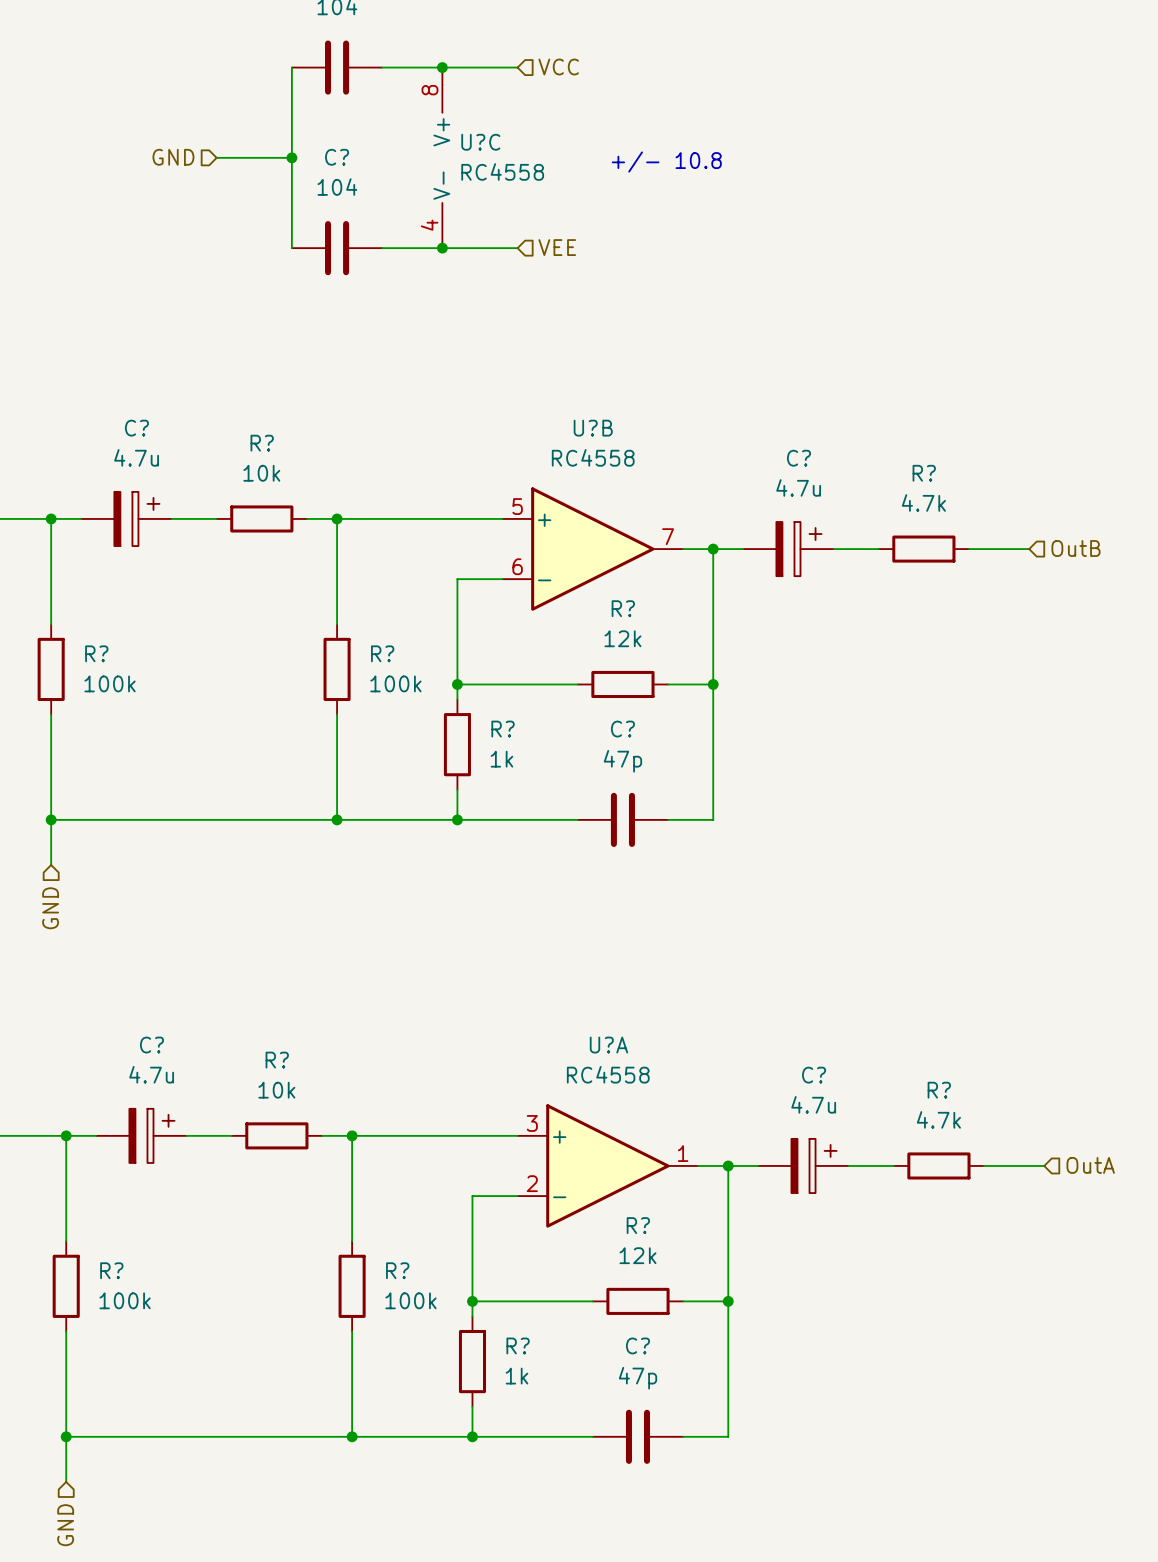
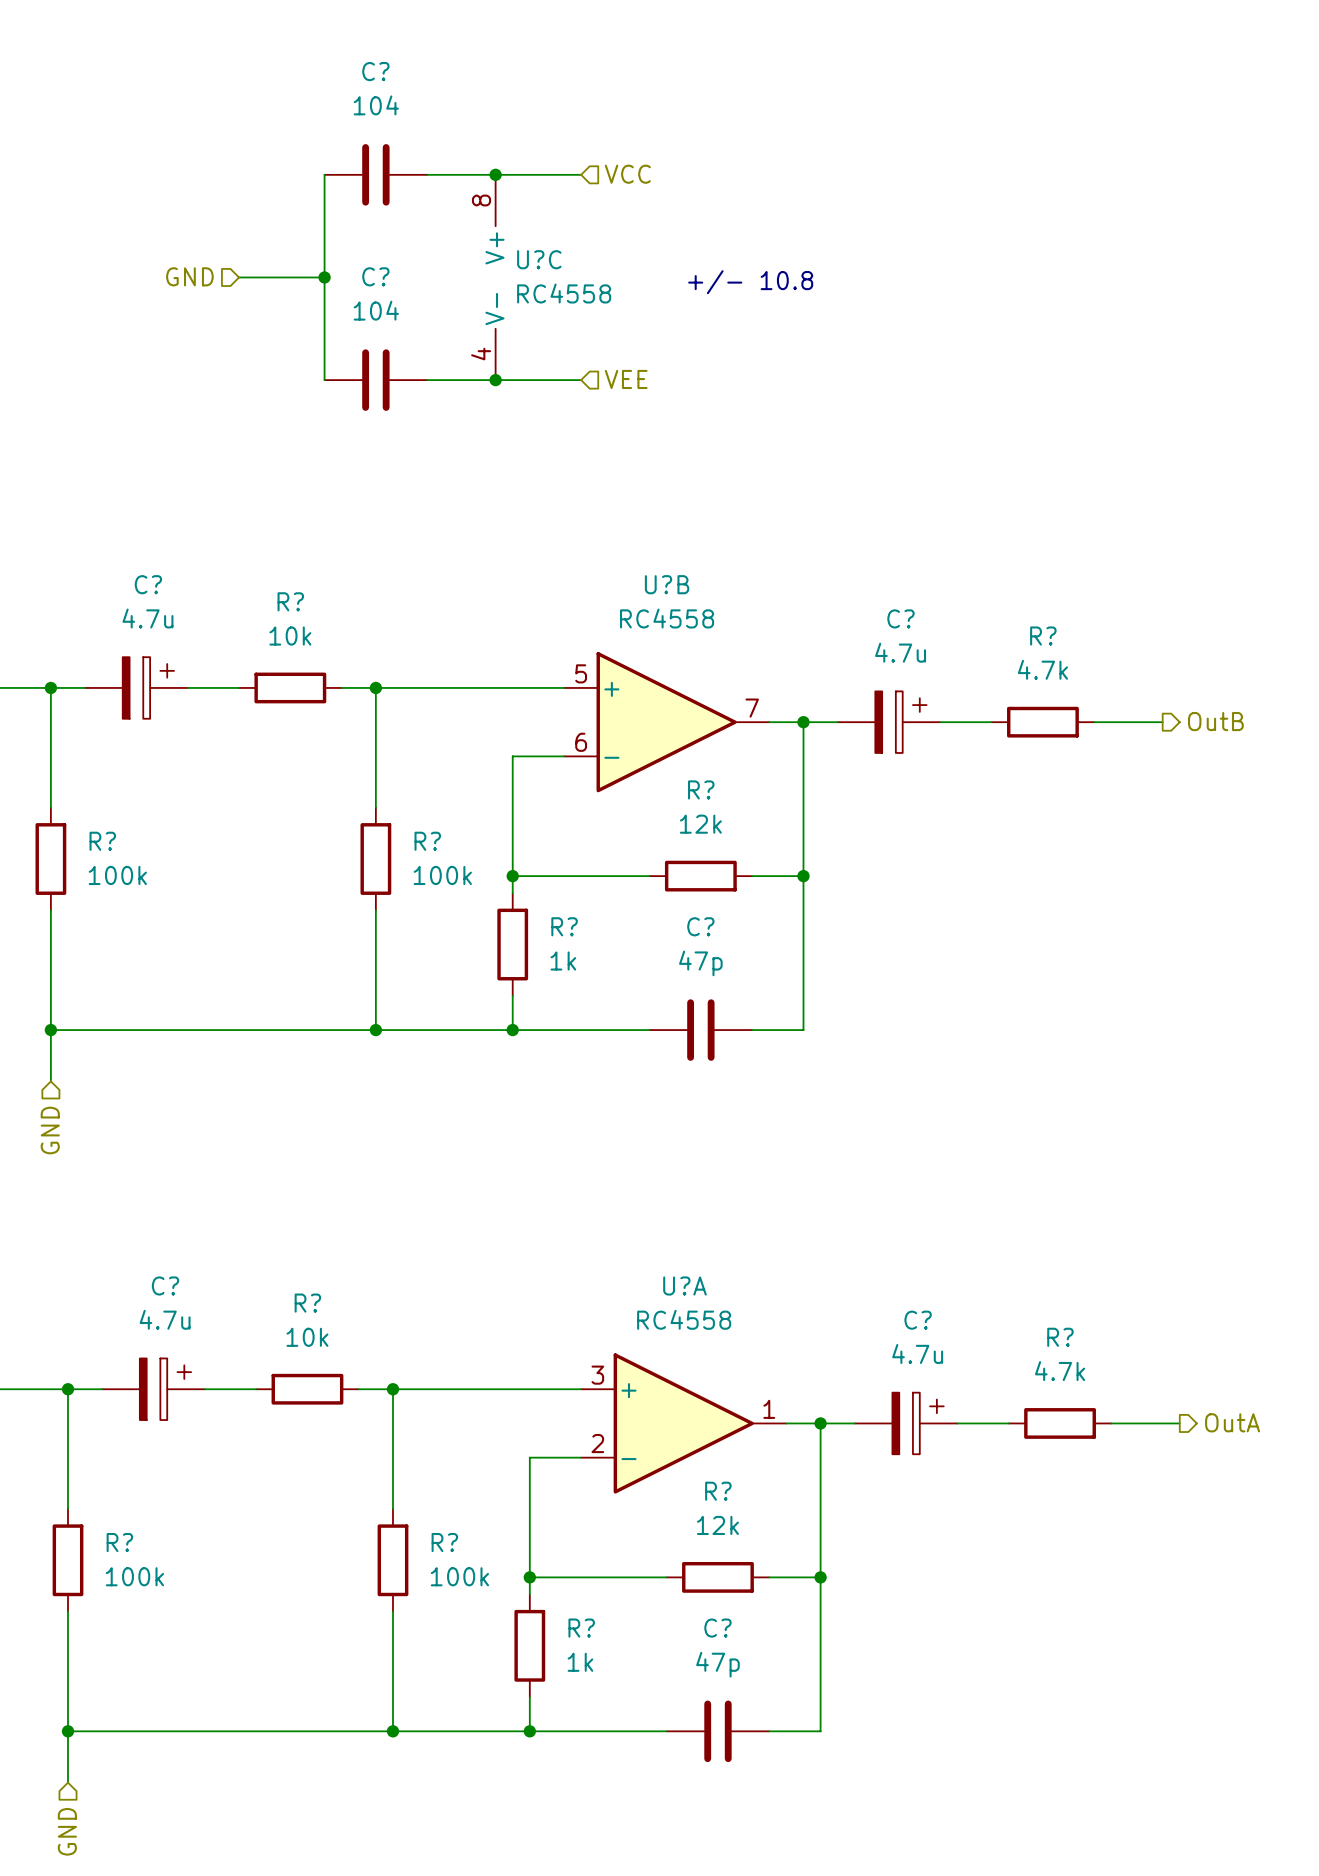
hierarchical label shape: input (1076, 548) -> output (1215, 721)
hierarchical label shape: input (1090, 1165) -> output (1232, 1422)

